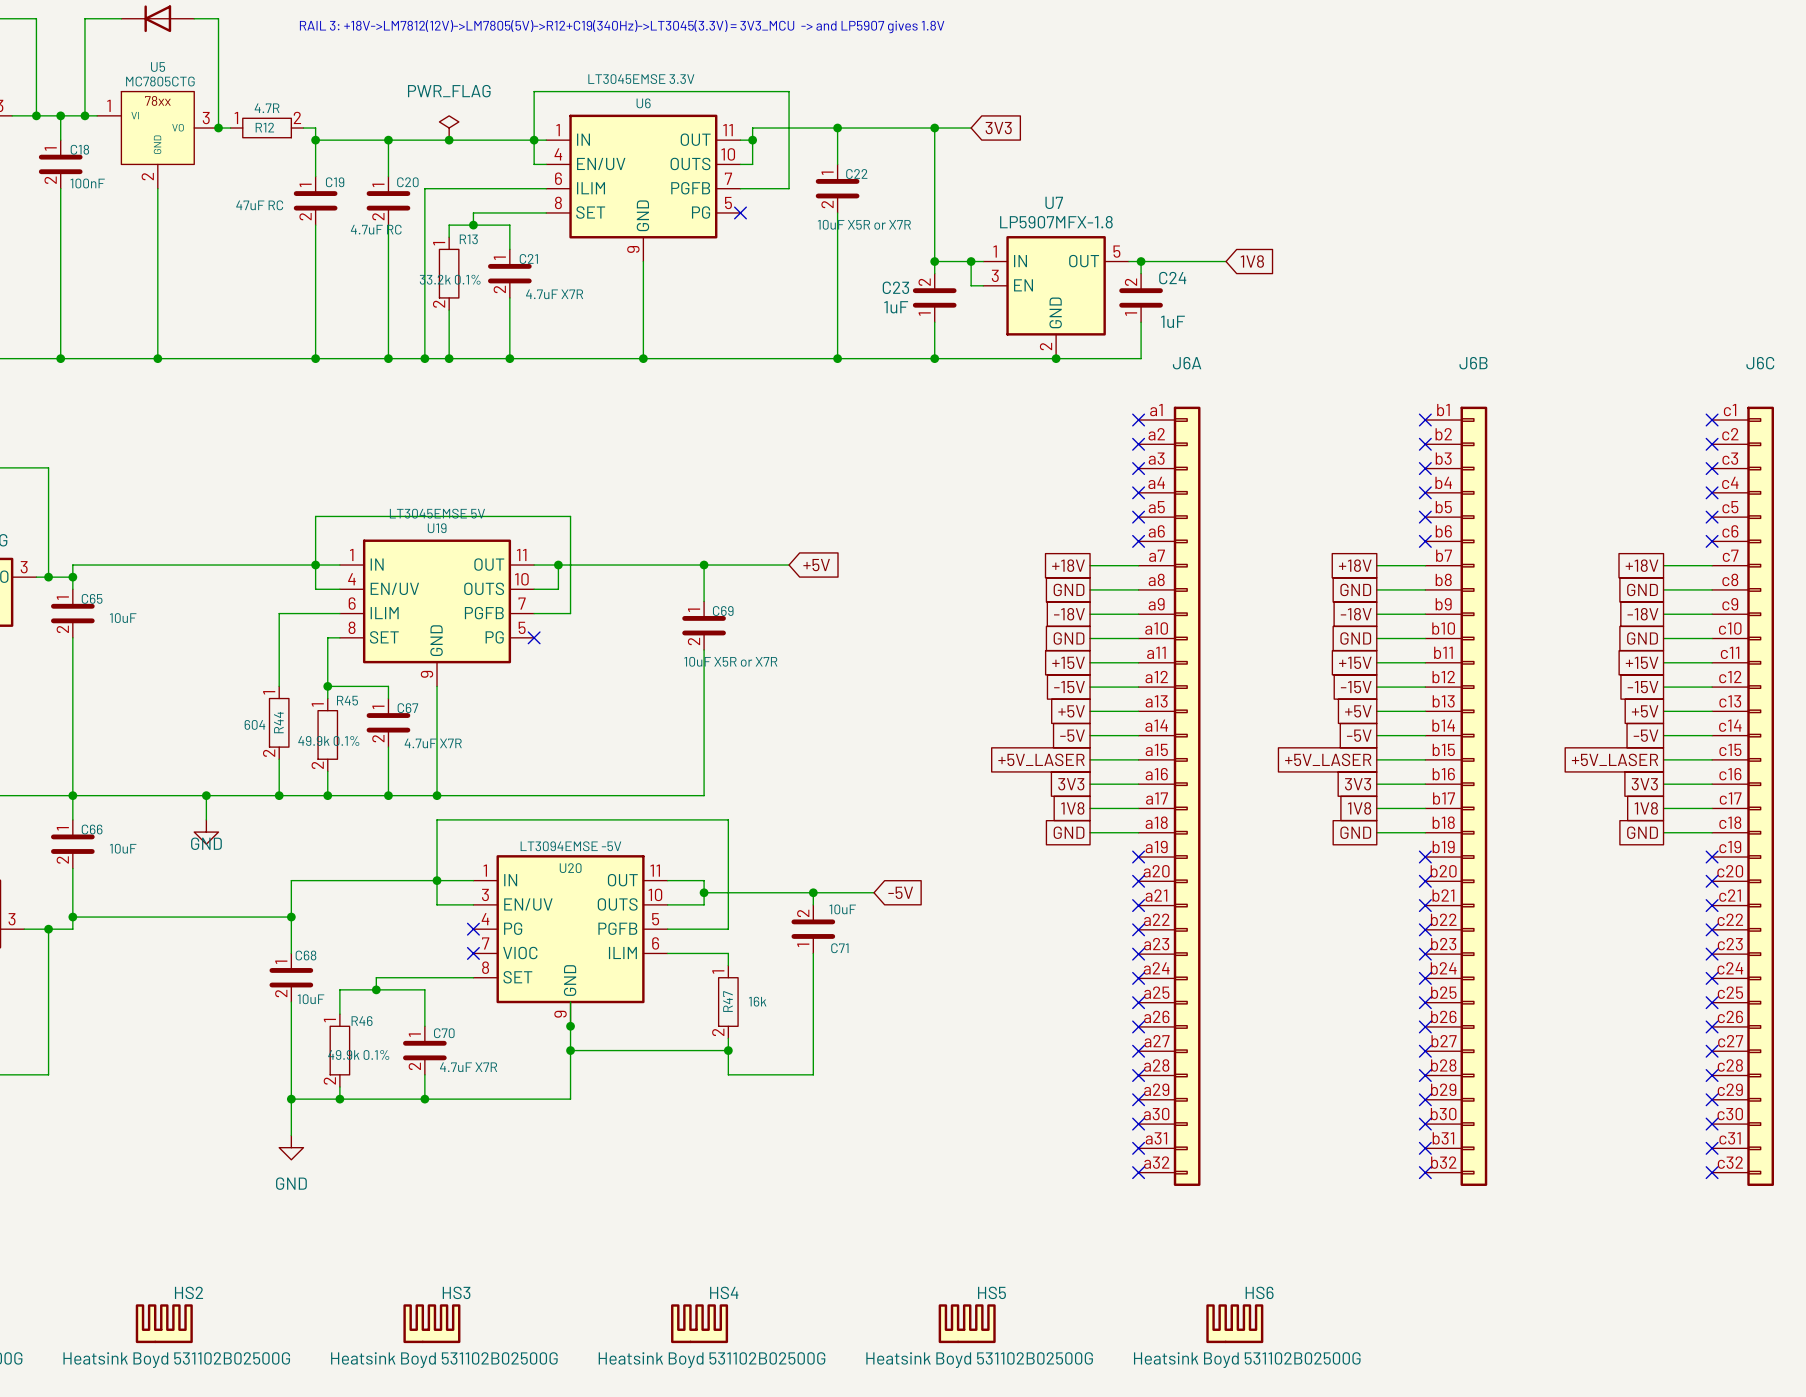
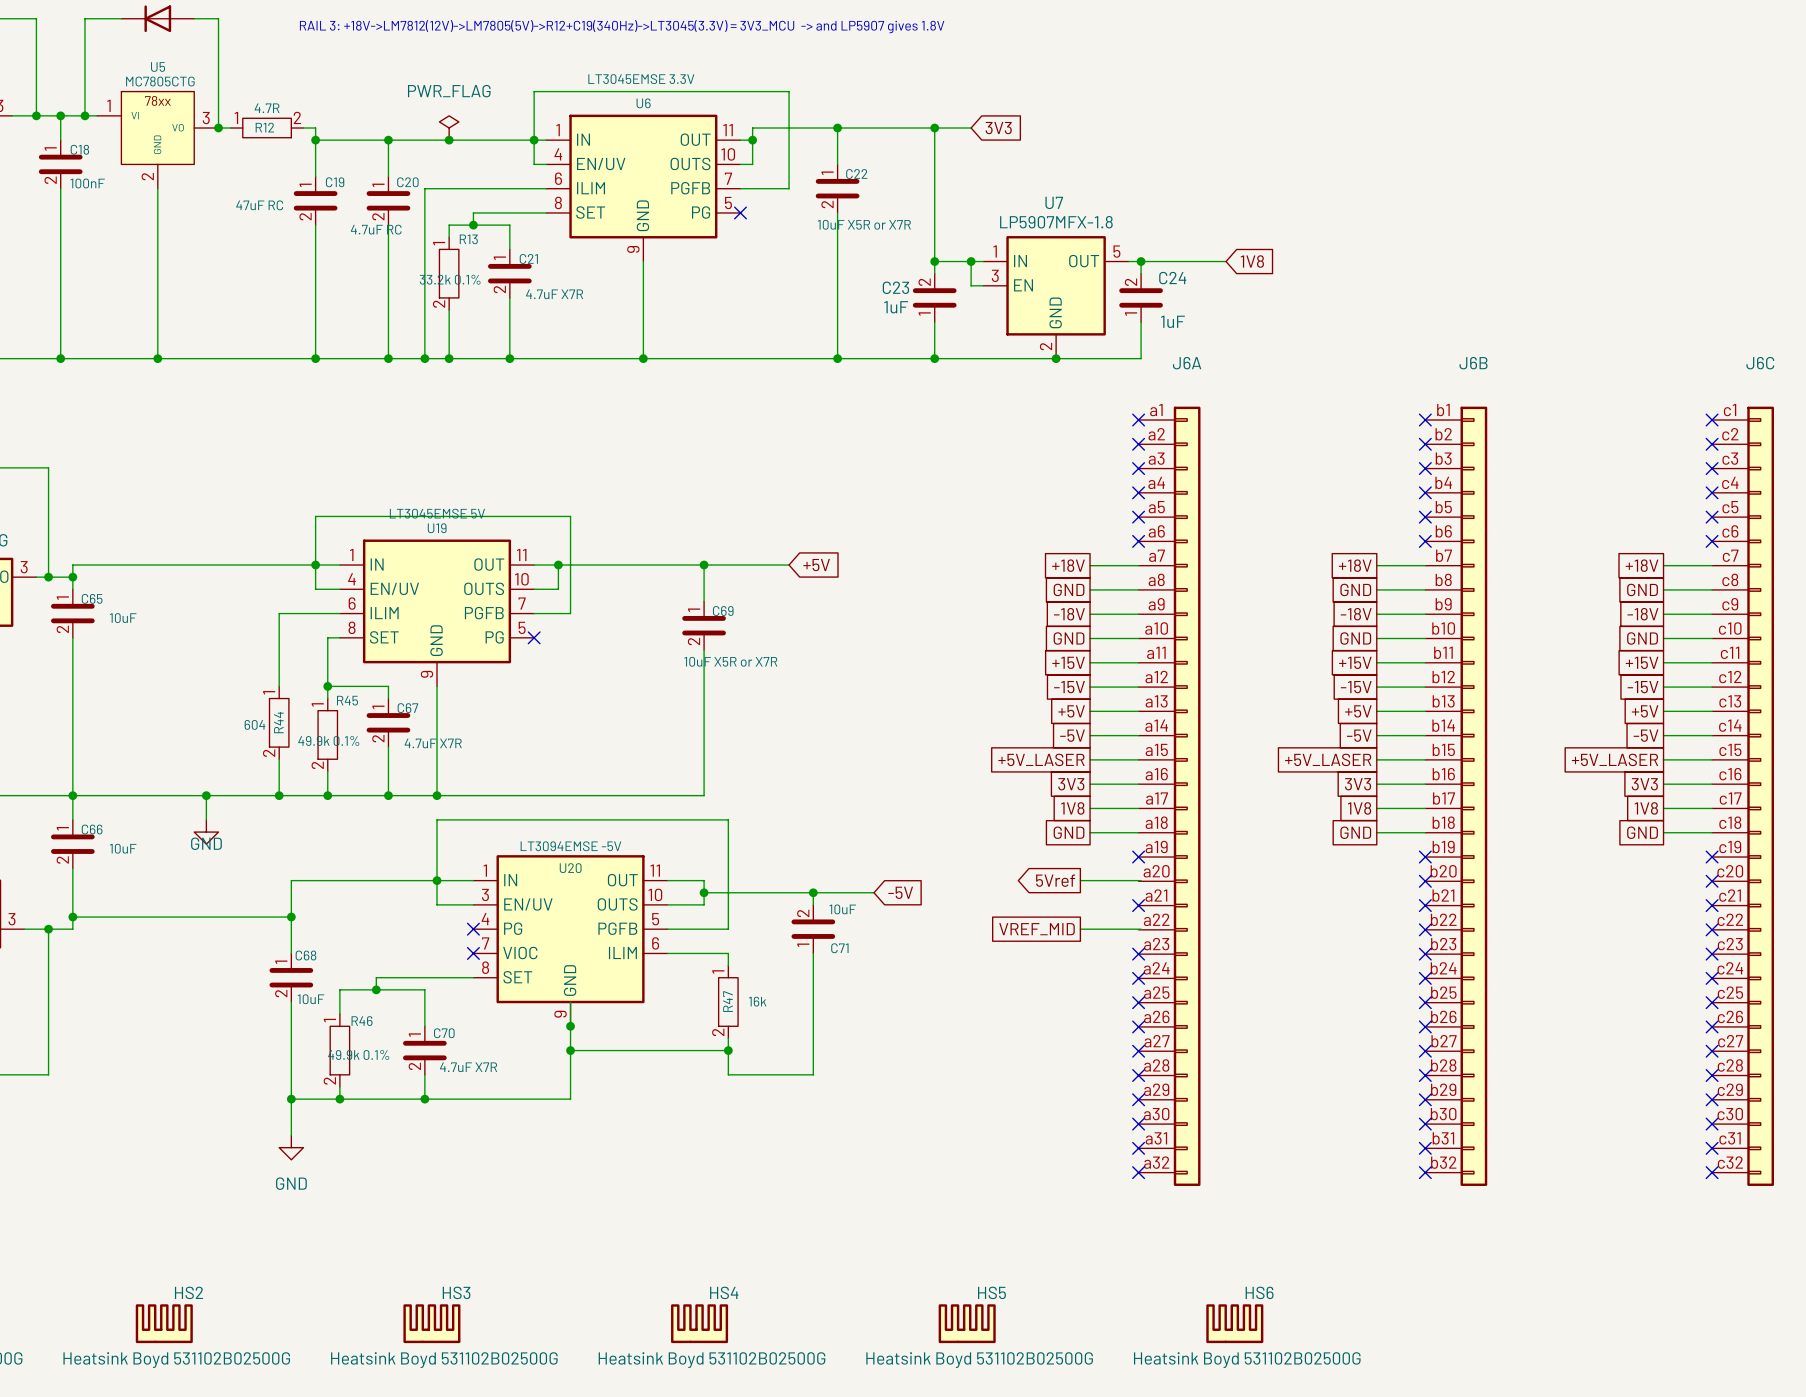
global label: none -> 5Vref (1055, 880)
wire: none -> (1080, 880) (1141, 880)
no-connect mark: (1138, 881) -> none
global label: none -> VREF_MID (1037, 929)
wire: none -> (1080, 929) (1141, 929)
no-connect mark: (1138, 929) -> none

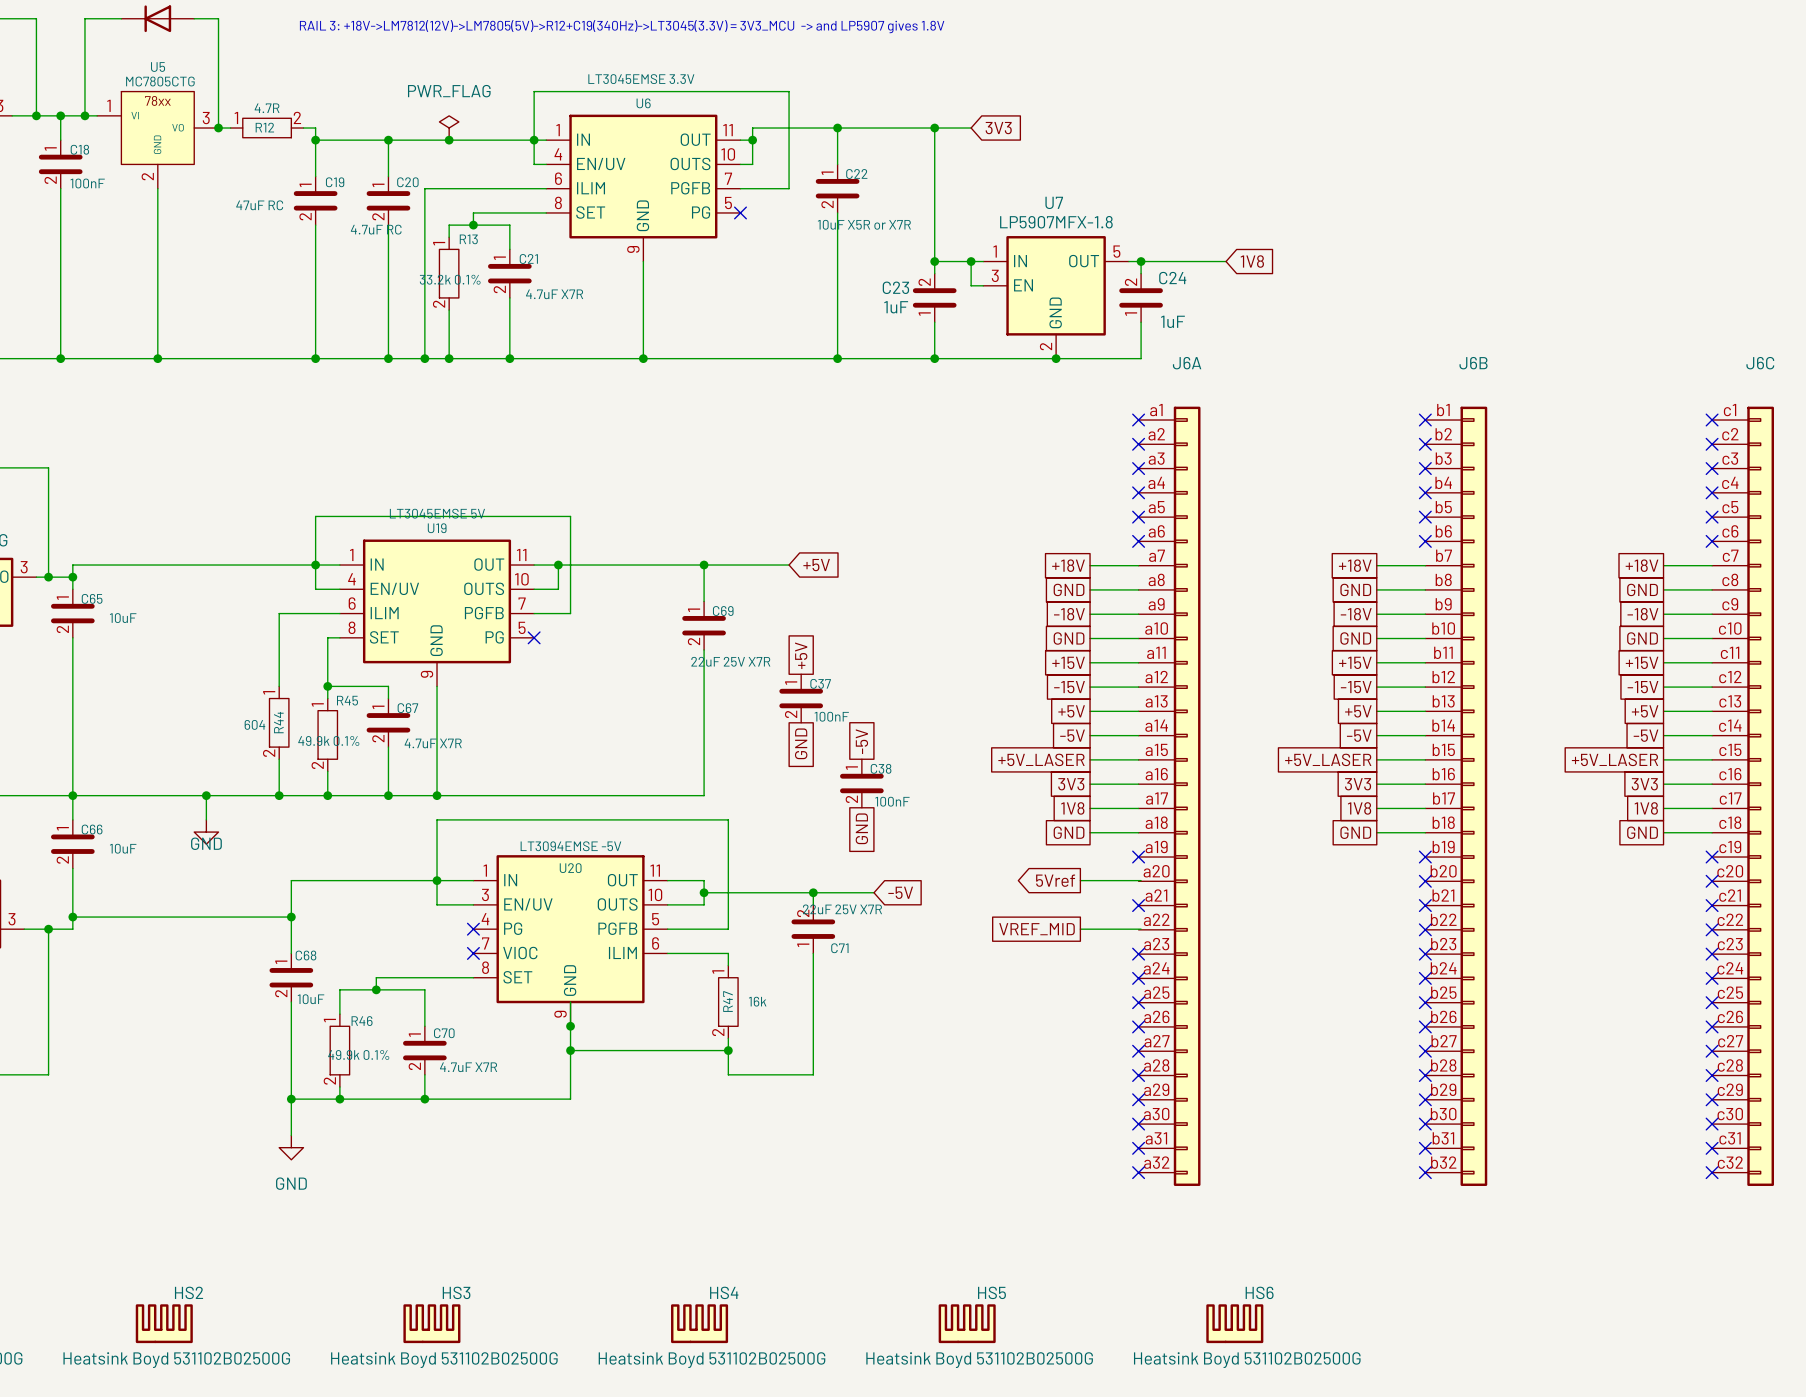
global label: none -> +5V (801, 655)
C69 value: 10uF X5R or X7R (730, 661) -> 22uF 25V X7R (730, 661)
C37: none -> 100nF (801, 698)
global label: none -> -5V (861, 741)
global label: none -> GND (801, 743)
C38: none -> 100nF (861, 783)
global label: none -> GND (861, 828)
C71 value: 10uF (842, 909) -> 22uF 25V X7R (842, 909)

